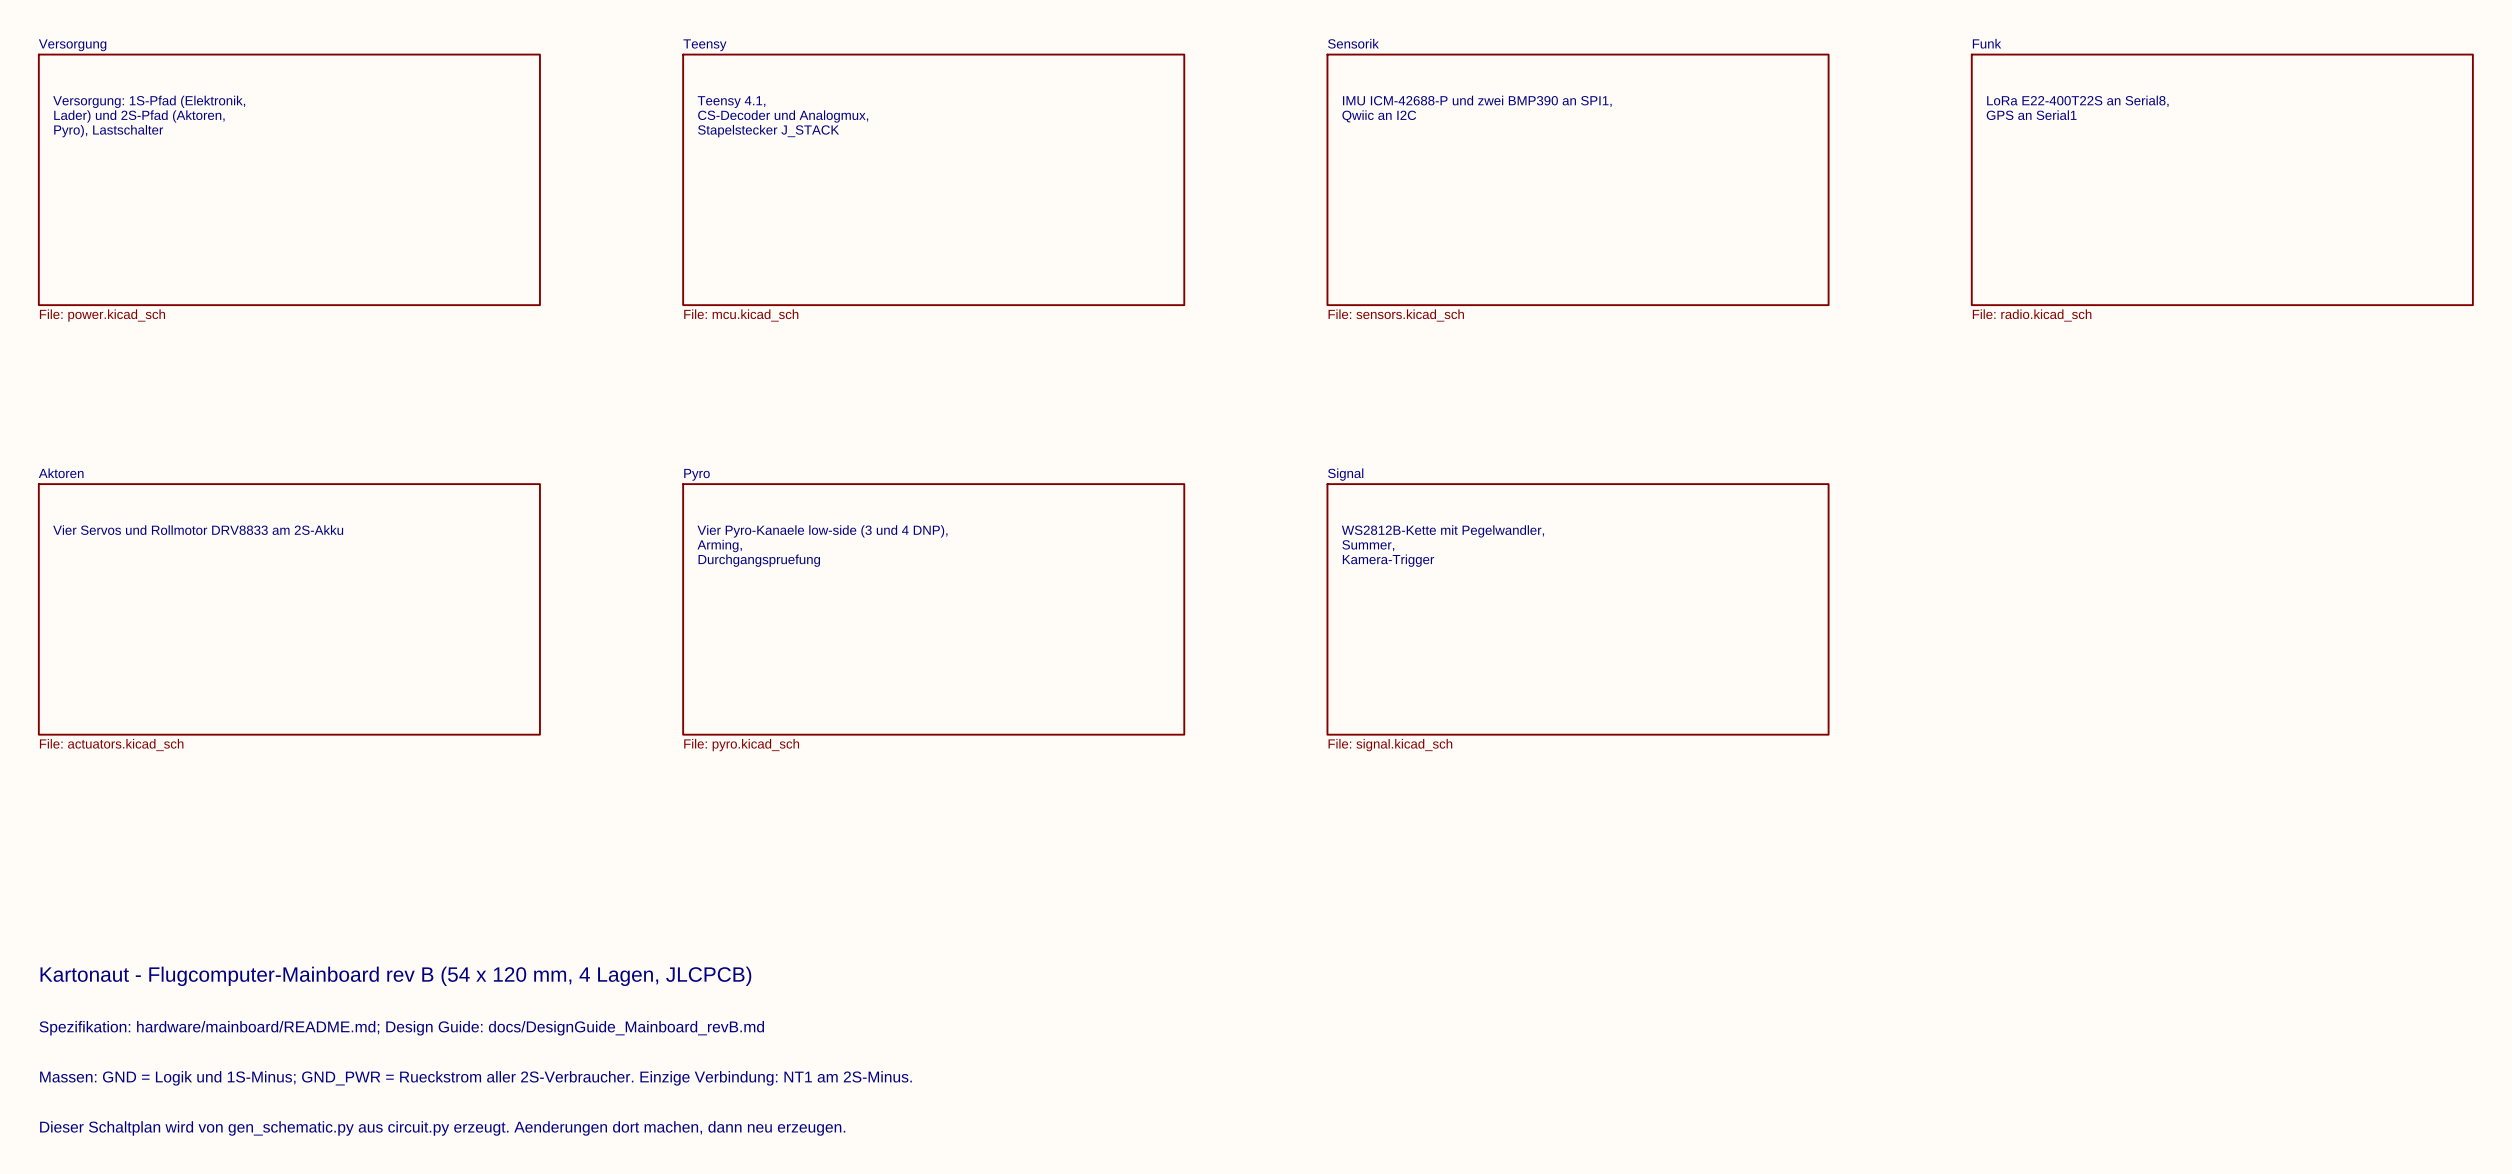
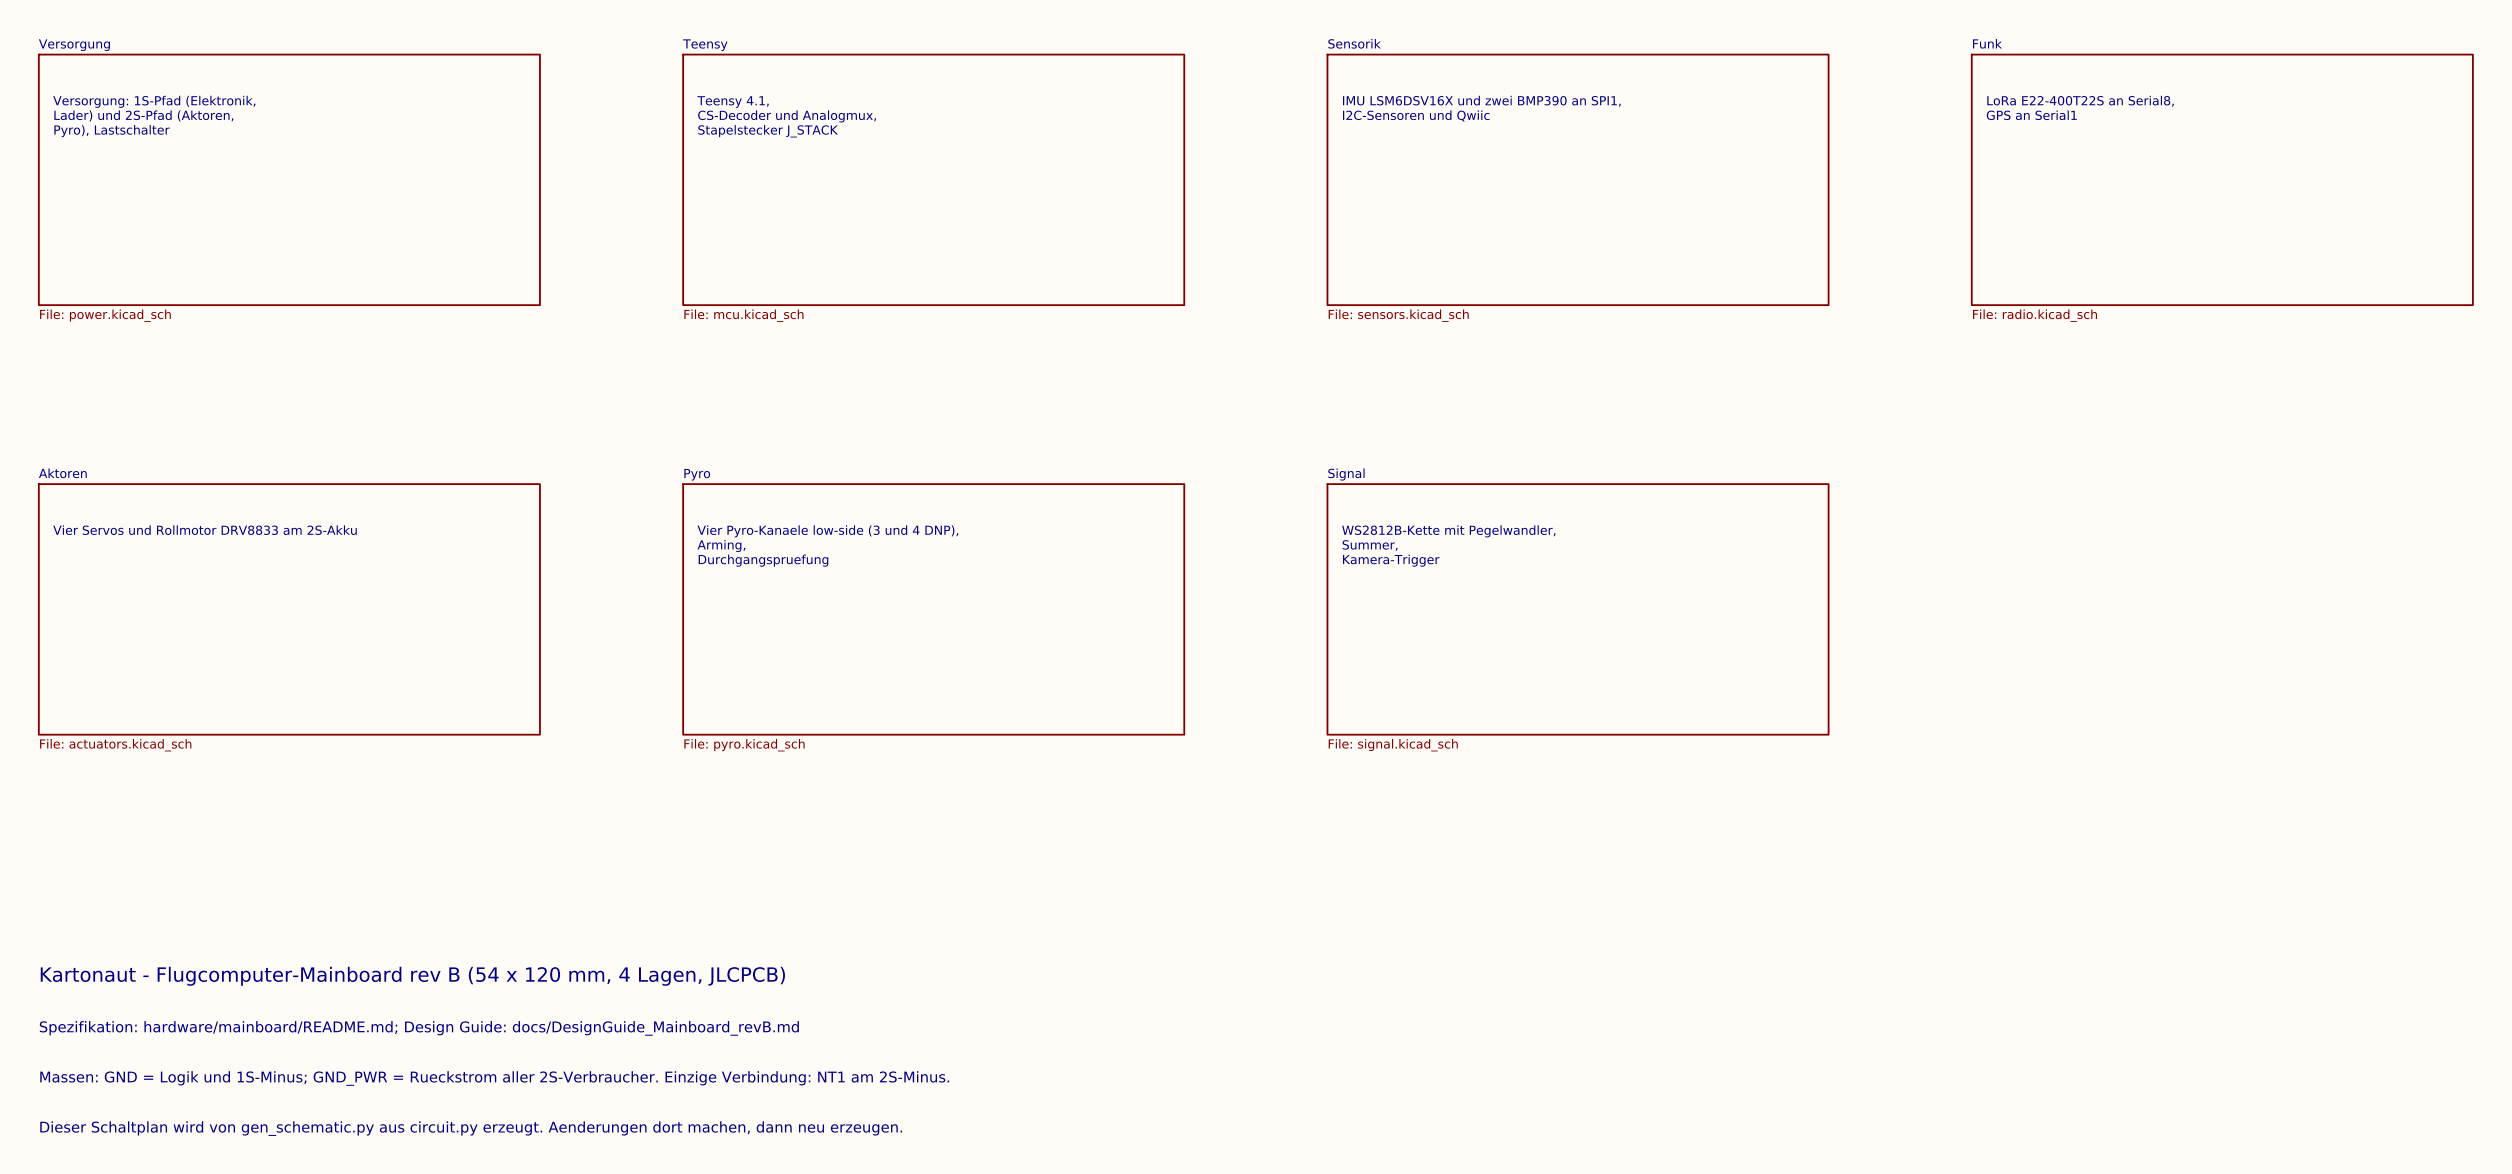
text: IMU ICM-42688-P und zwei BMP390 an SPI1, (1477, 101) -> IMU LSM6DSV16X und zwei BMP390 an SPI1, (1481, 101)
text: Qwiic an I2C (1379, 116) -> I2C-Sensoren und Qwiic (1416, 115)

